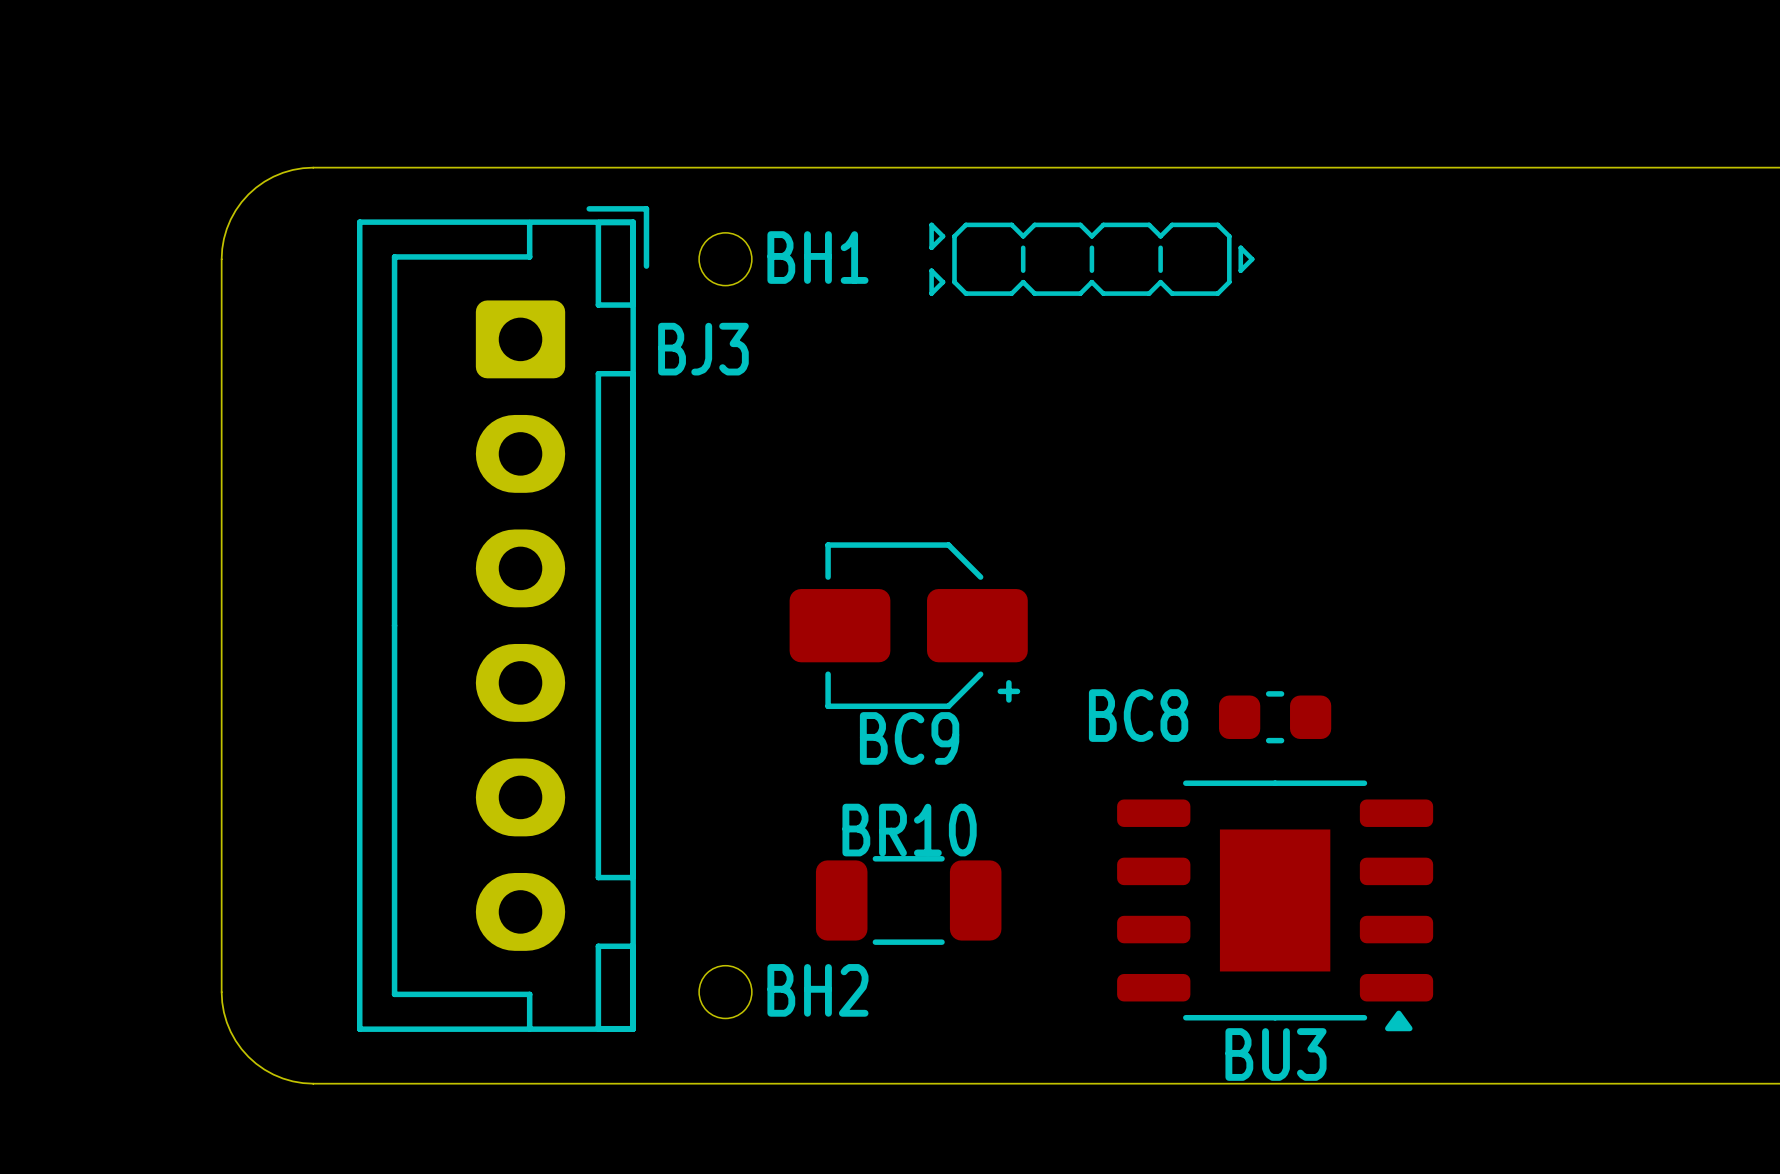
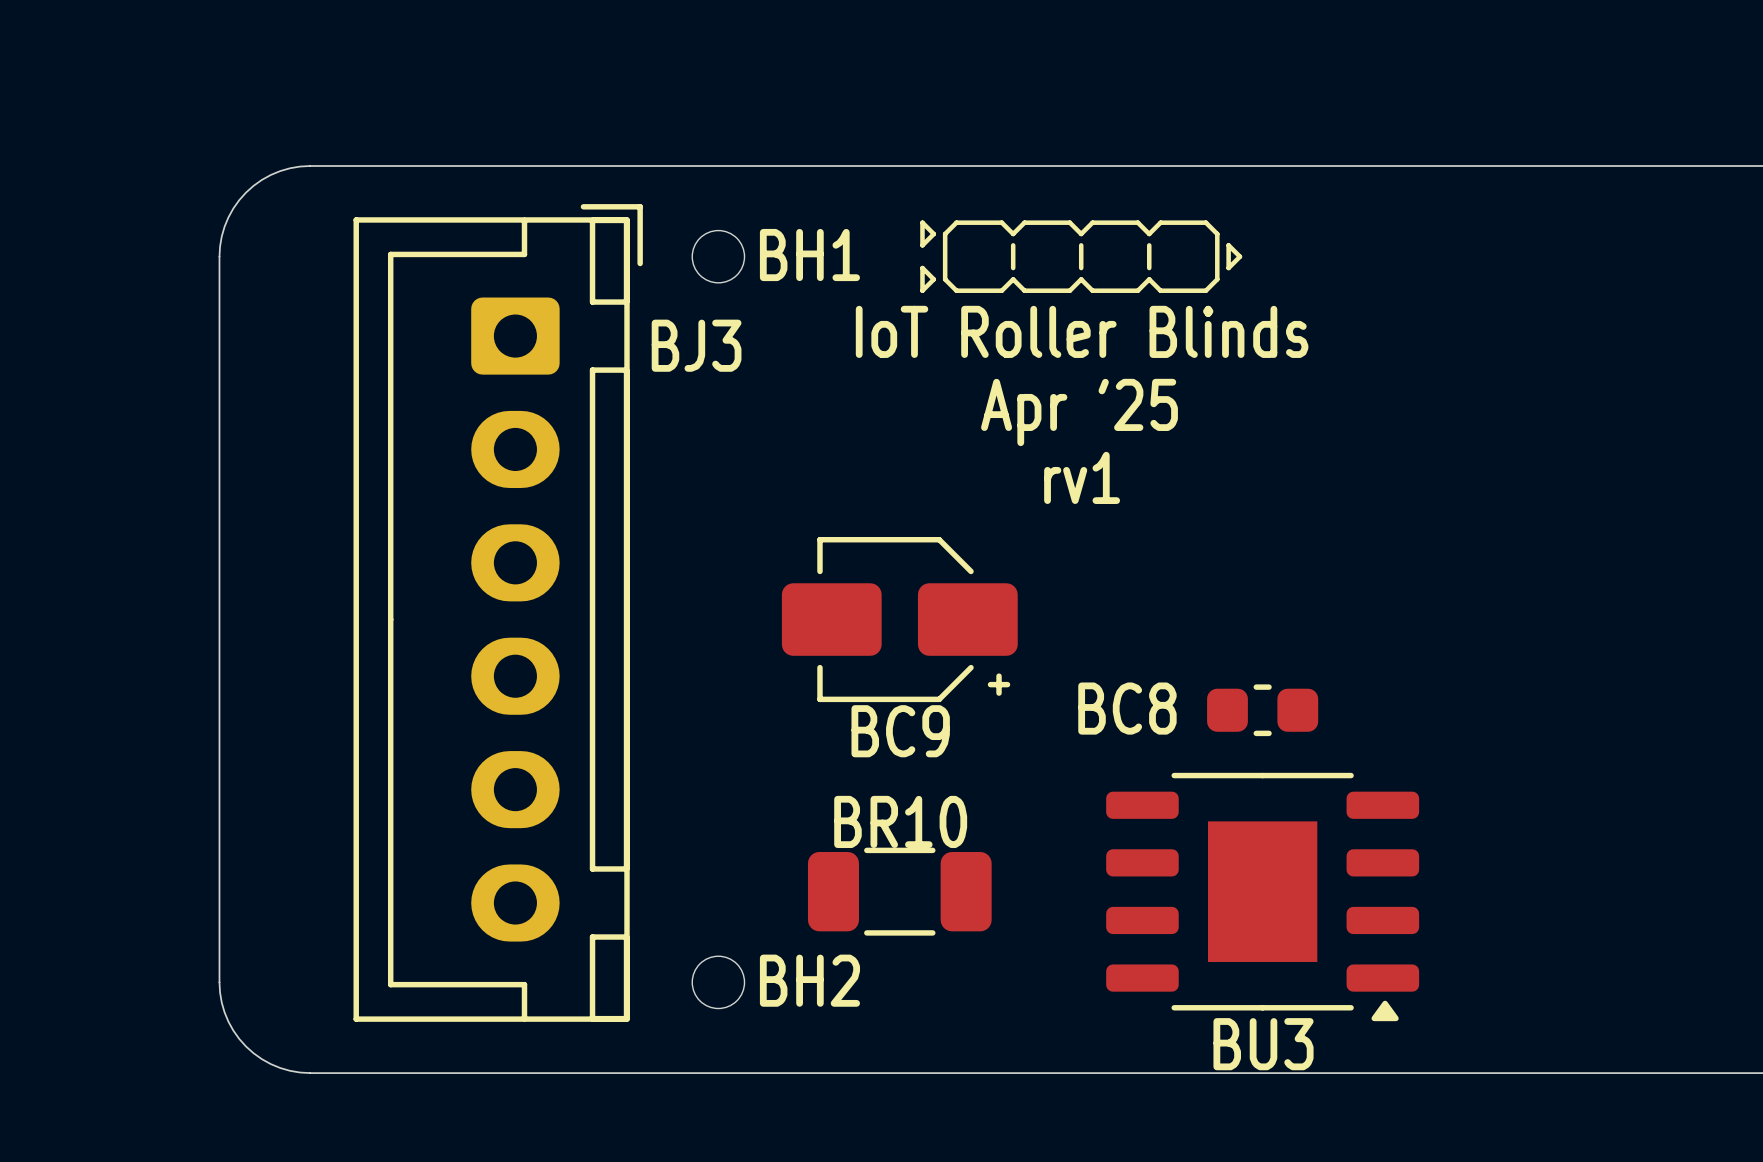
text: none -> IoT Roller Blinds (1082, 331)
text: none -> Apr '25 (1079, 412)
text: none -> rv1 (1082, 477)

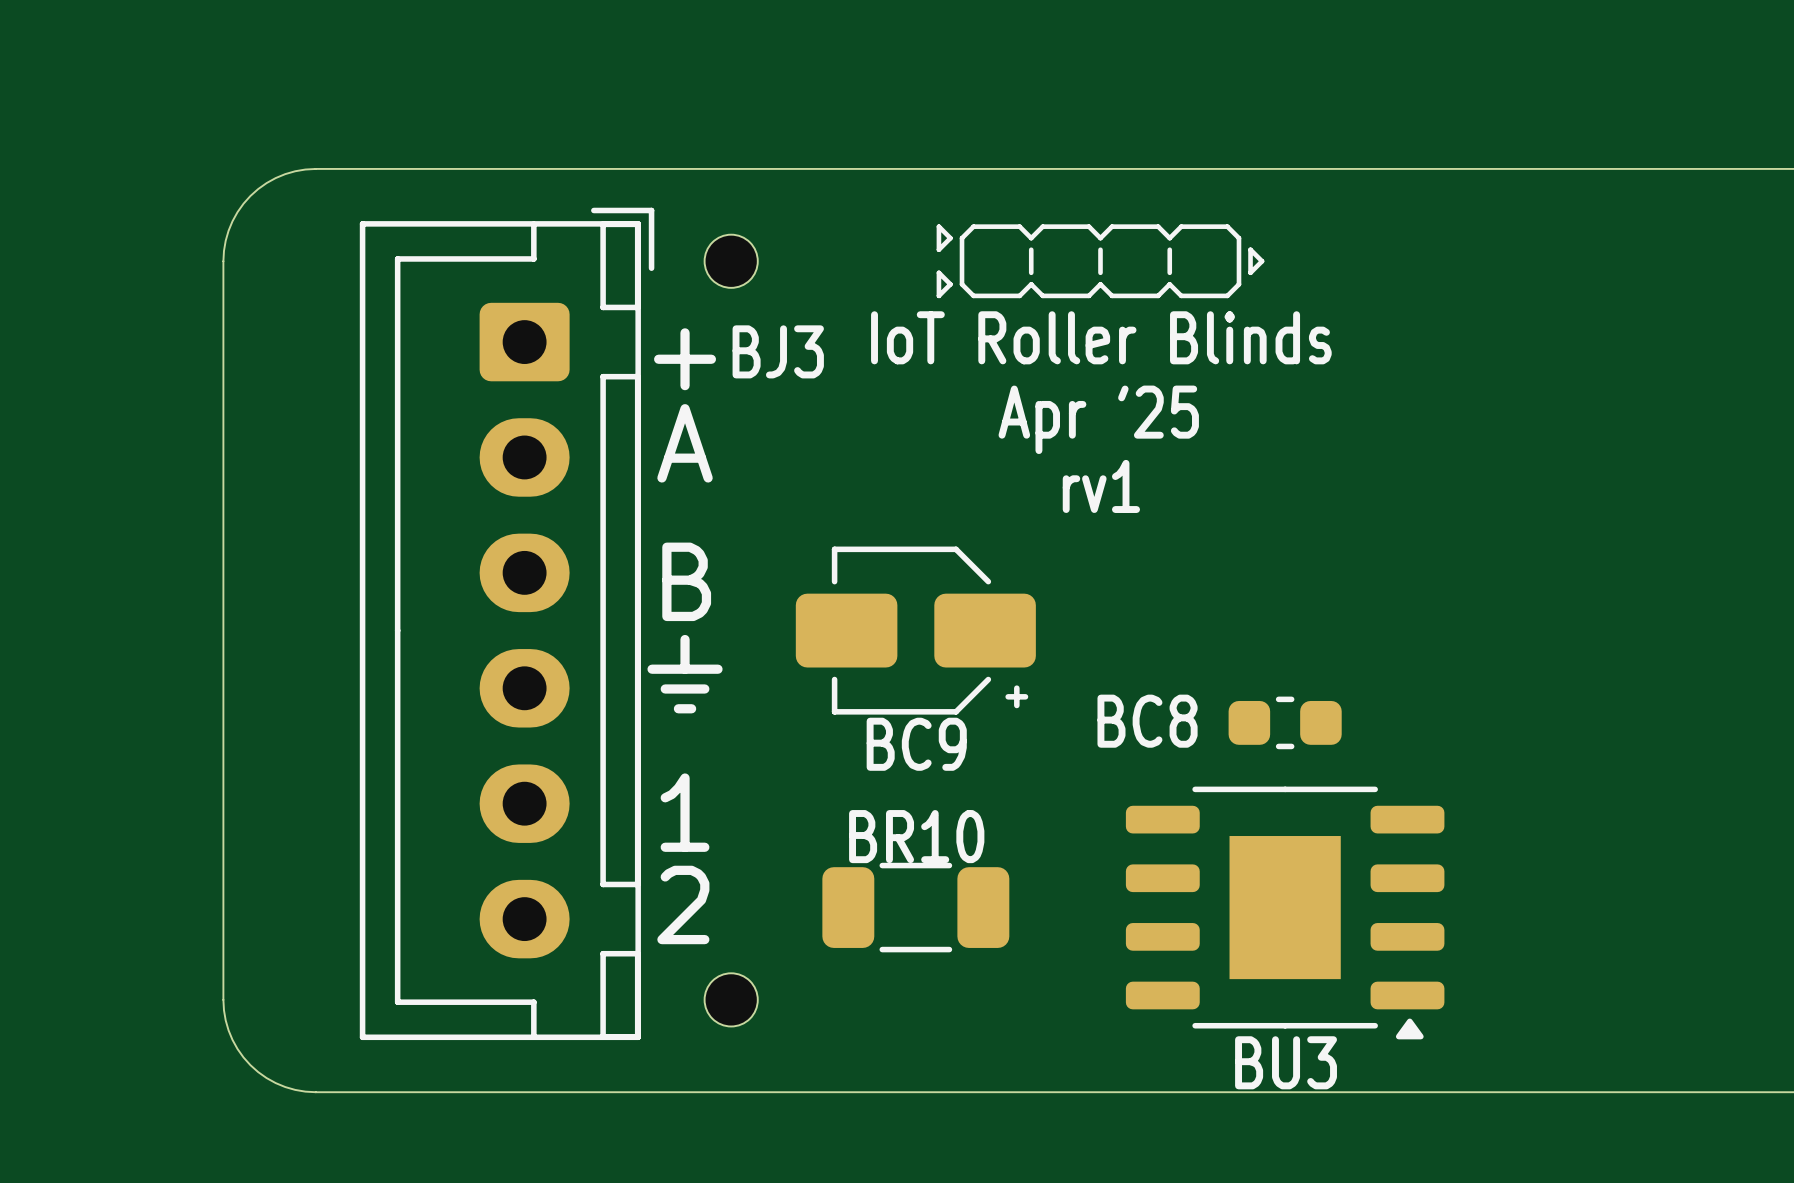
BH1 name: BH1 (809, 255) -> none
BJ3 name position: BJ3 (696, 345) -> BJ3 (778, 351)
text: none -> + (685, 359)
text: none -> A (685, 443)
text: none -> B (686, 581)
text: none -> ⏚ (685, 674)
text: none -> 1 (685, 812)
text: none -> 2 (683, 904)
BH2 name: BH2 (809, 980) -> none

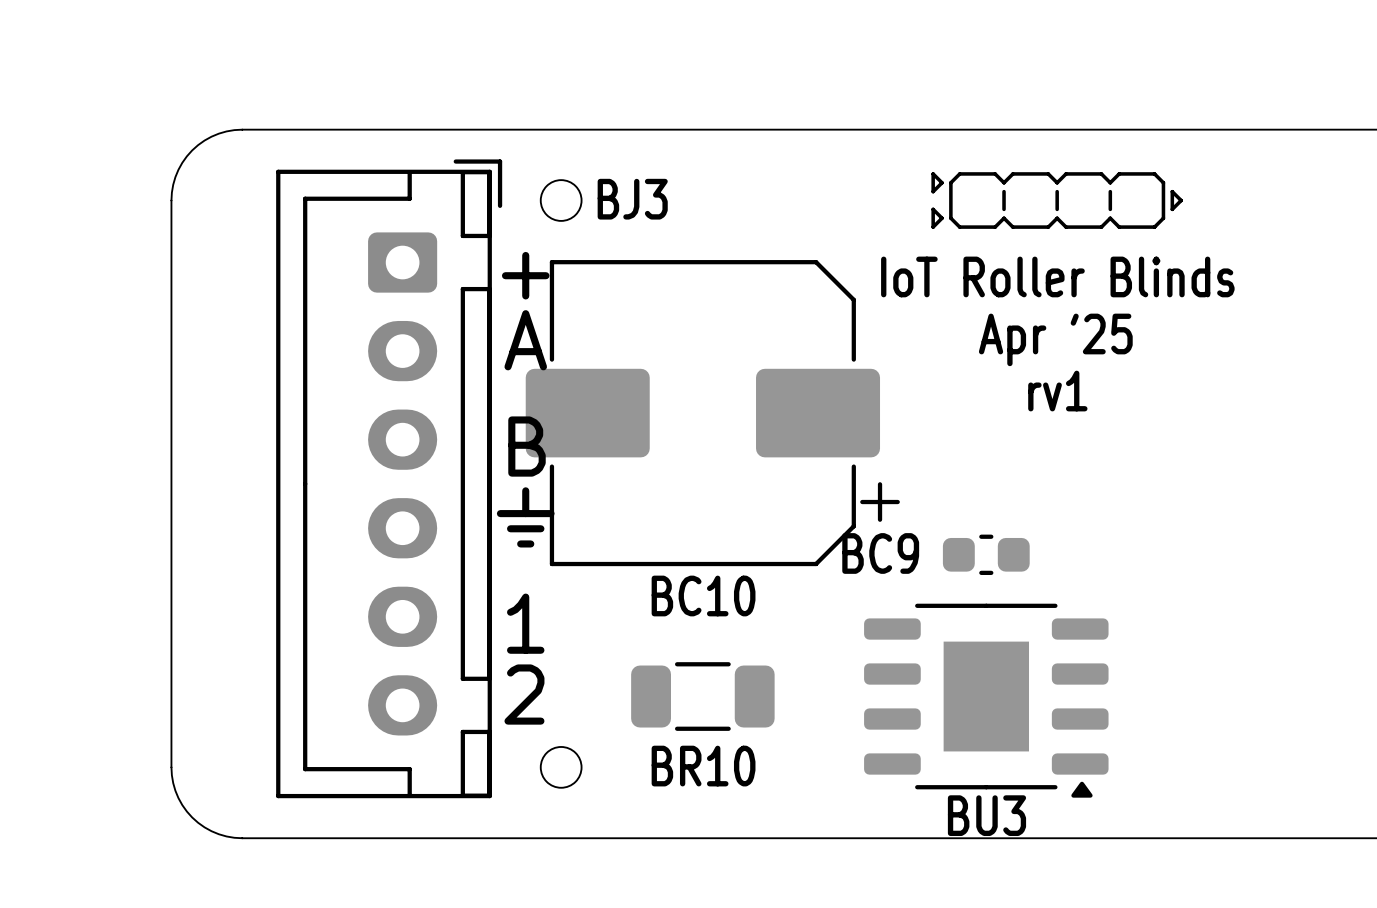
drawing position: (1100, 261) -> (1057, 200)
text position: IoT Roller Blinds (1101, 337) -> IoT Roller Blinds (1057, 276)
BJ3 name position: BJ3 (778, 351) -> BJ3 (632, 199)
text position: Apr '25 (1098, 419) -> Apr '25 (1055, 339)
text position: rv1 (1101, 486) -> rv1 (1057, 391)
BC10: none -> (712, 413)
BC9: (915, 630) -> none
BC8 name: BC8 (1147, 721) -> BC9 (880, 553)
BR10 name position: BR10 (916, 836) -> BR10 (703, 766)

